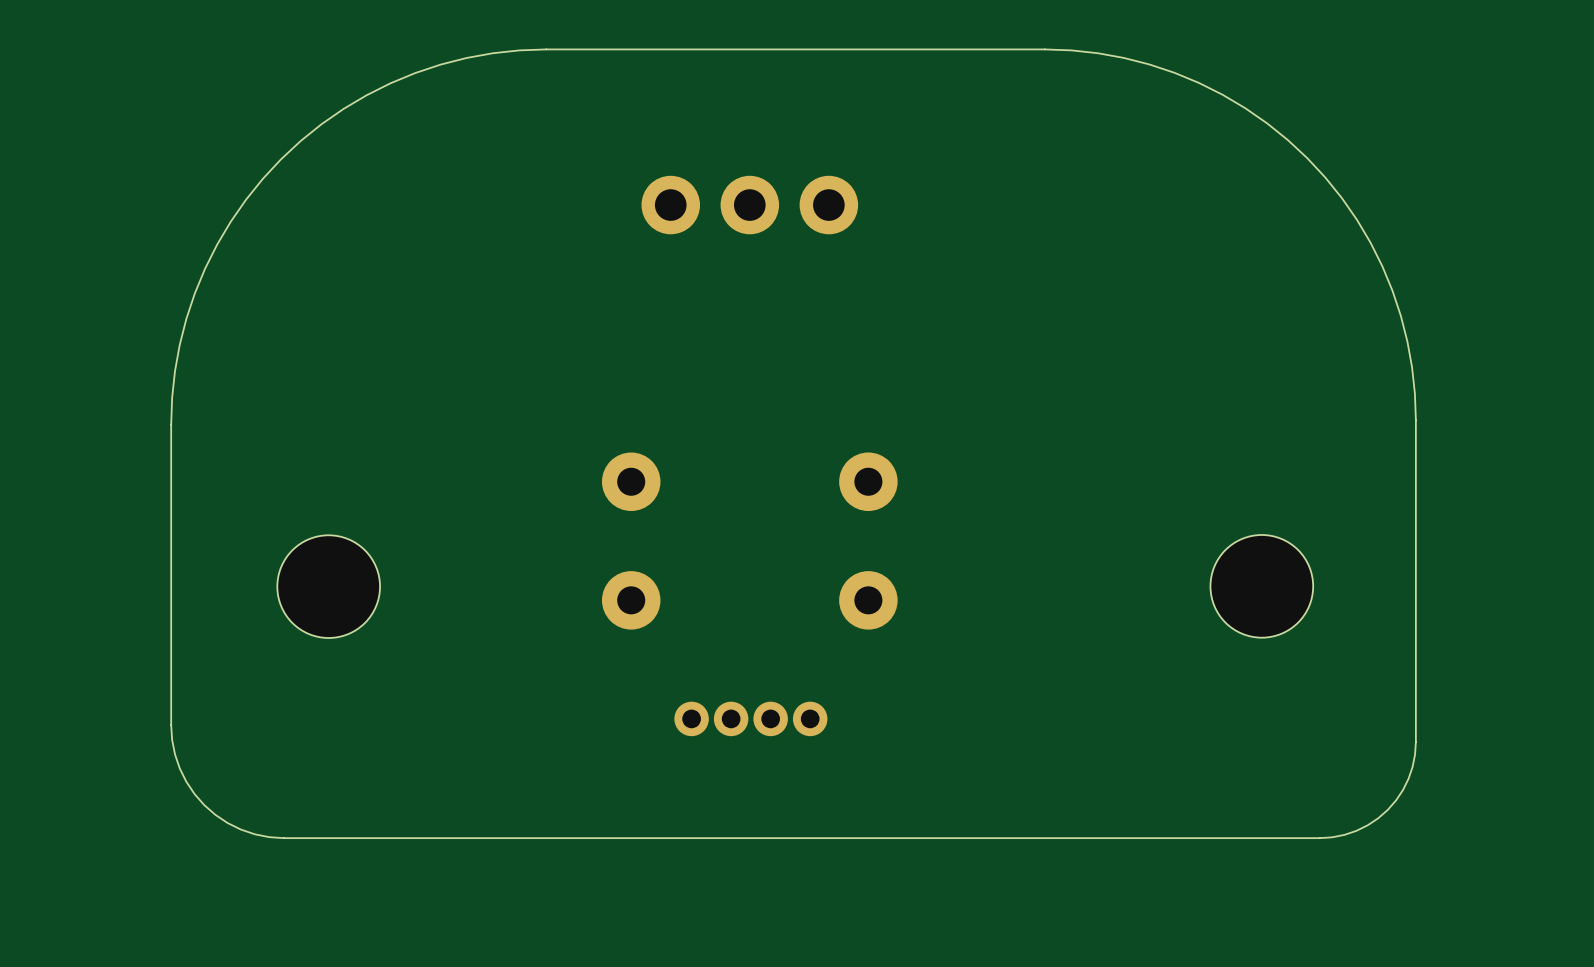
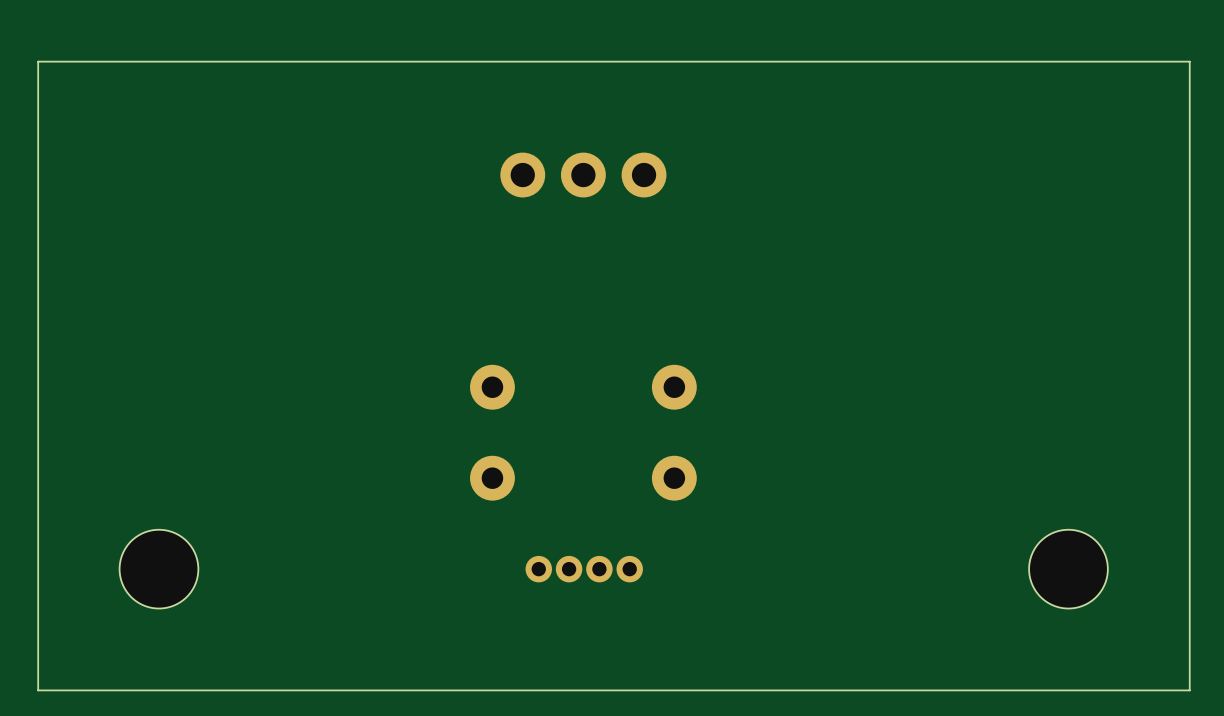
board edge: (1044, 49) (546, 49) (492, 53) (440, 64) (390, 83) (343, 108) (300, 141) (262, 178) (246, 199) (217, 244) (205, 268) (186, 318) (175, 371) (171, 424) (172, 739) (175, 754) (186, 781) (204, 805) (227, 823) (240, 829) (269, 837) (284, 838) (1319, 838) (1332, 837) (1356, 830) (1378, 818) (1387, 809) (1396, 800) (1408, 778) (1415, 754) (1415, 420) (1412, 367) (1407, 341) (1392, 290) (1382, 266) (1356, 219) (1325, 177) (1287, 140) (1245, 108) (1199, 82) (1149, 64) (1097, 53) (1044, 49) -> (1189, 61) (1189, 690) (38, 690) (38, 61) (1189, 61)
part position: (328, 586) -> (158, 569)
part position: (1261, 586) -> (1068, 569)

